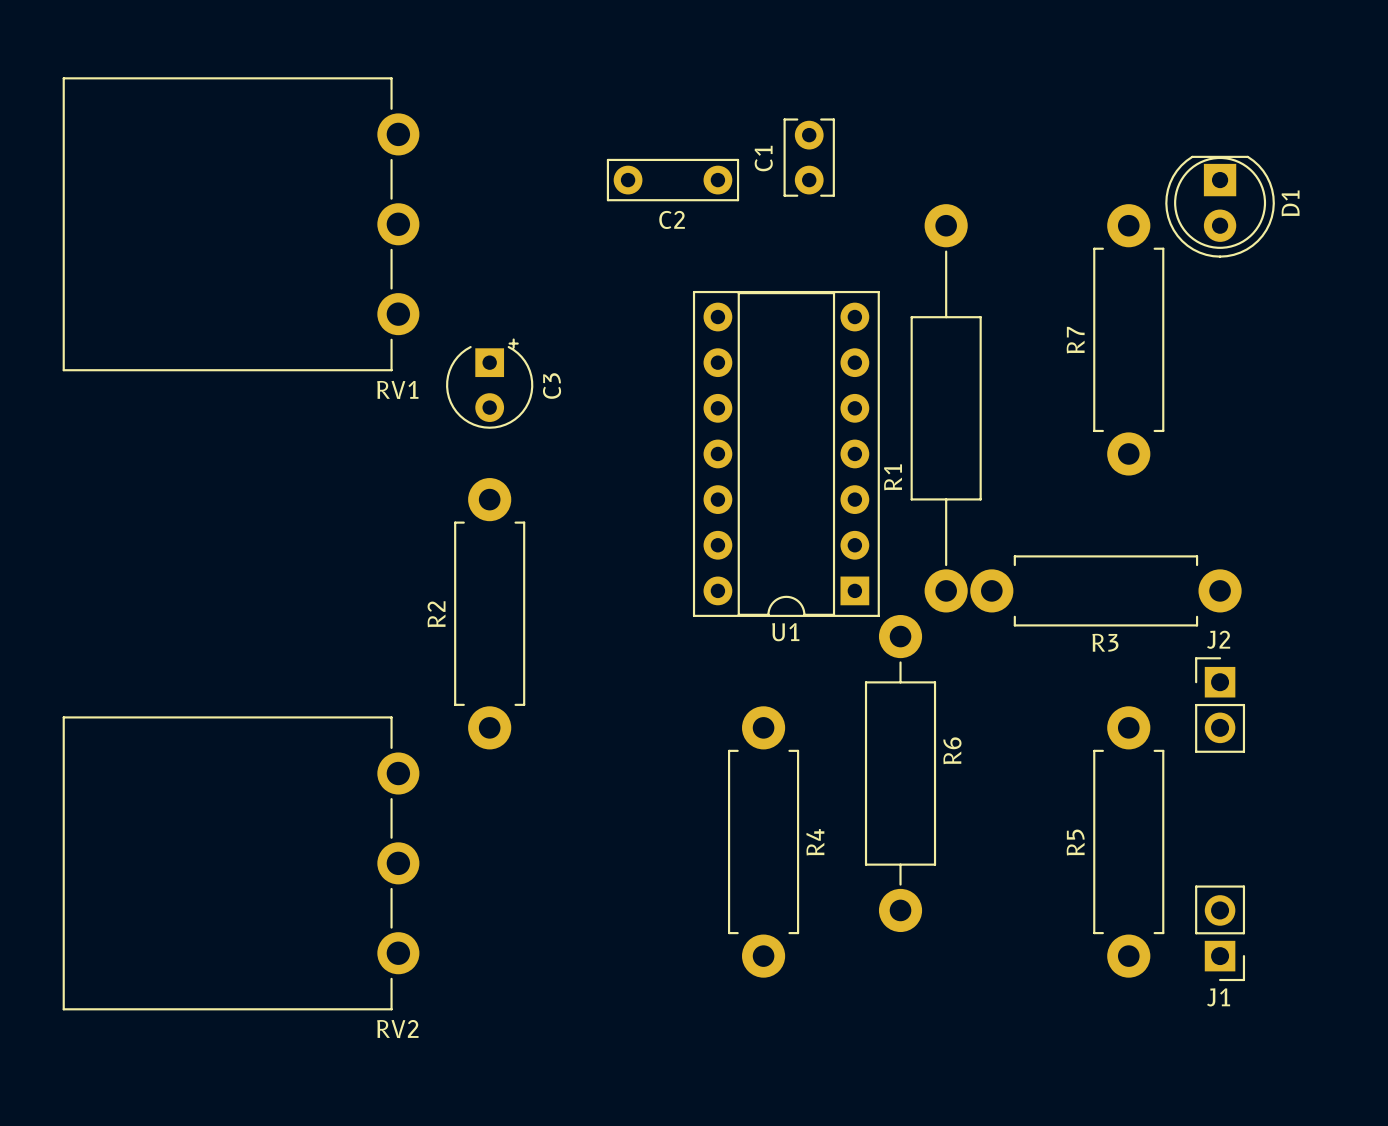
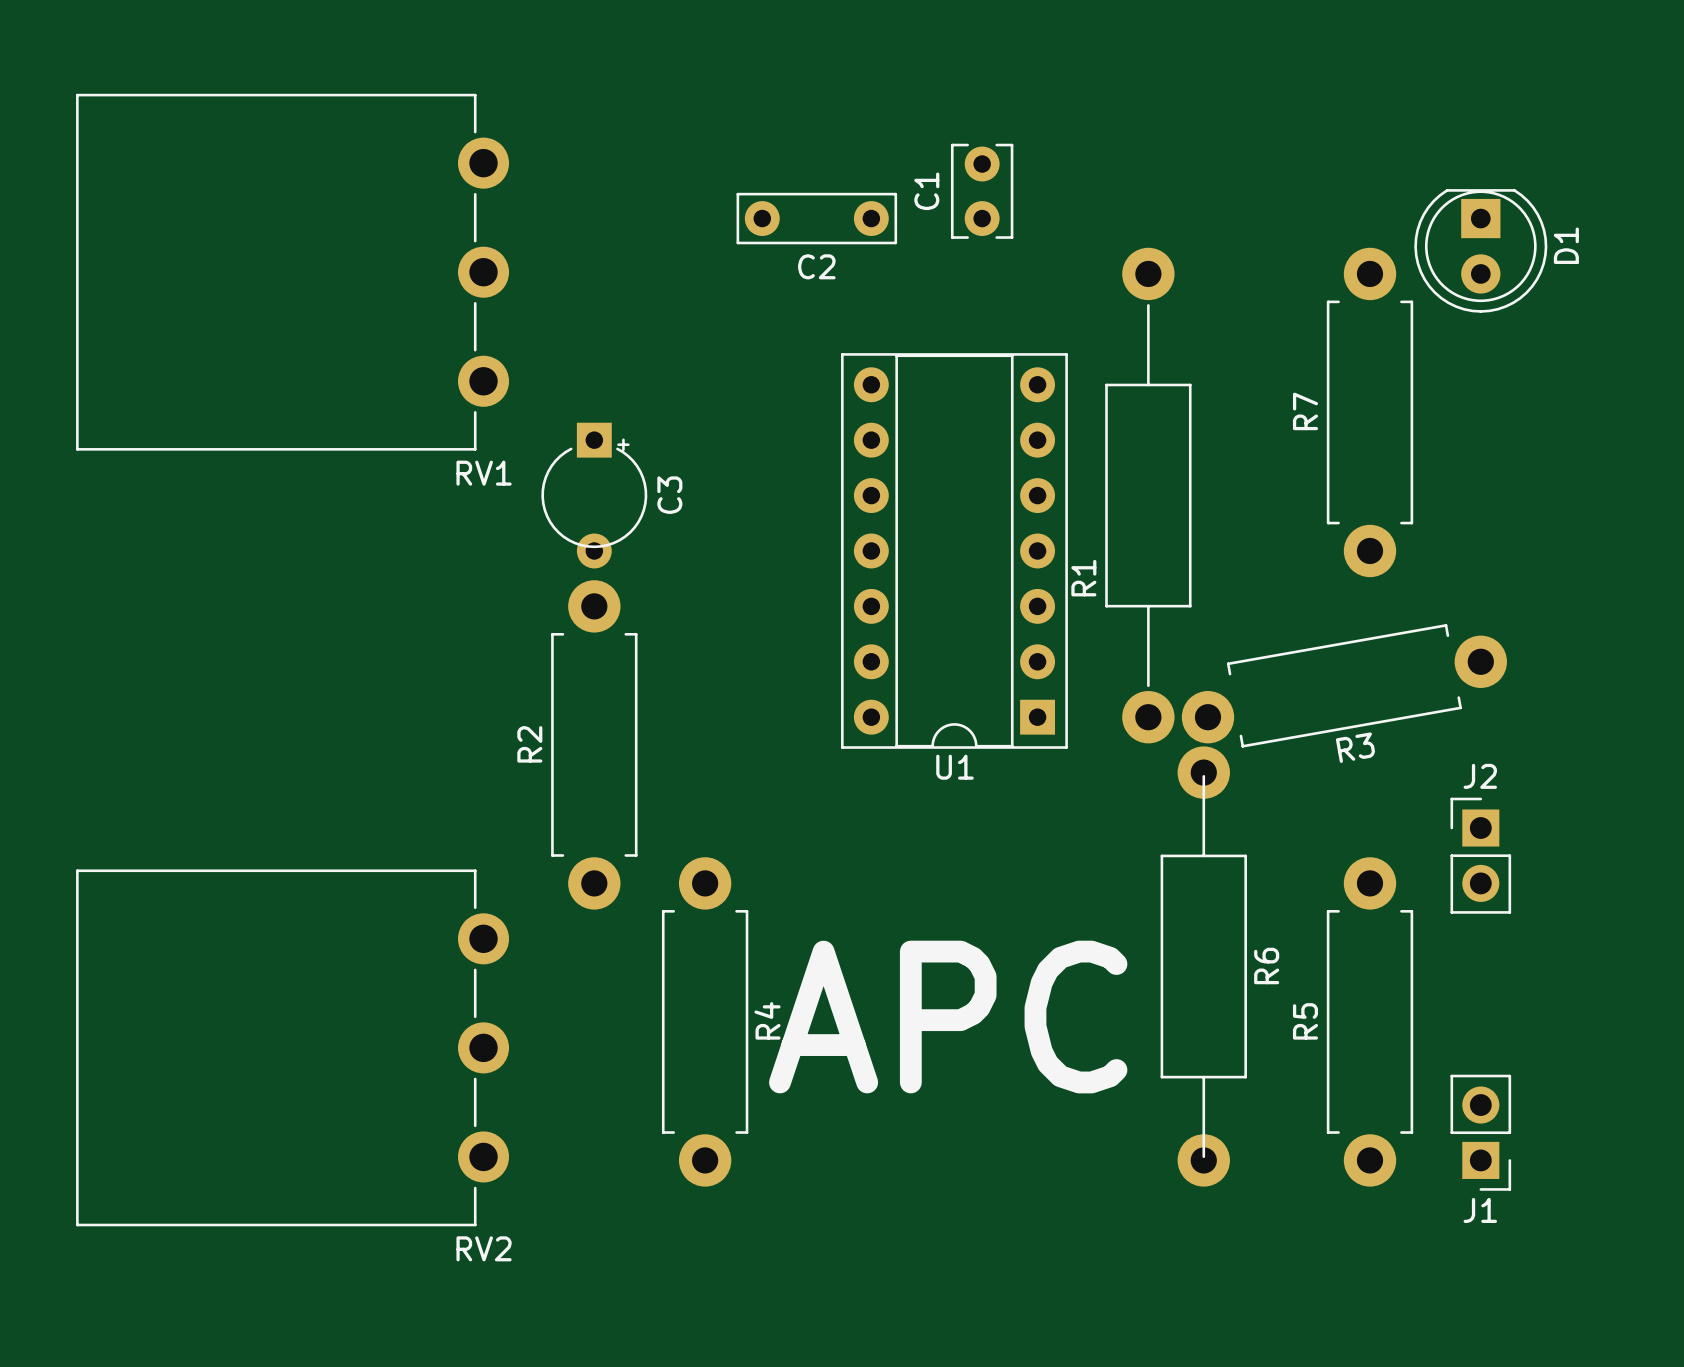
C3 footprint: [446, 338, 534, 429] -> [541, 422, 648, 569]
R3 footprint: [970, 555, 1242, 627] -> [1181, 624, 1507, 748]
R6 footprint: [864, 614, 937, 933] -> [1160, 746, 1247, 1187]
text: none -> APC (948, 1017)
R4 position: (763, 841) -> (705, 1021)

